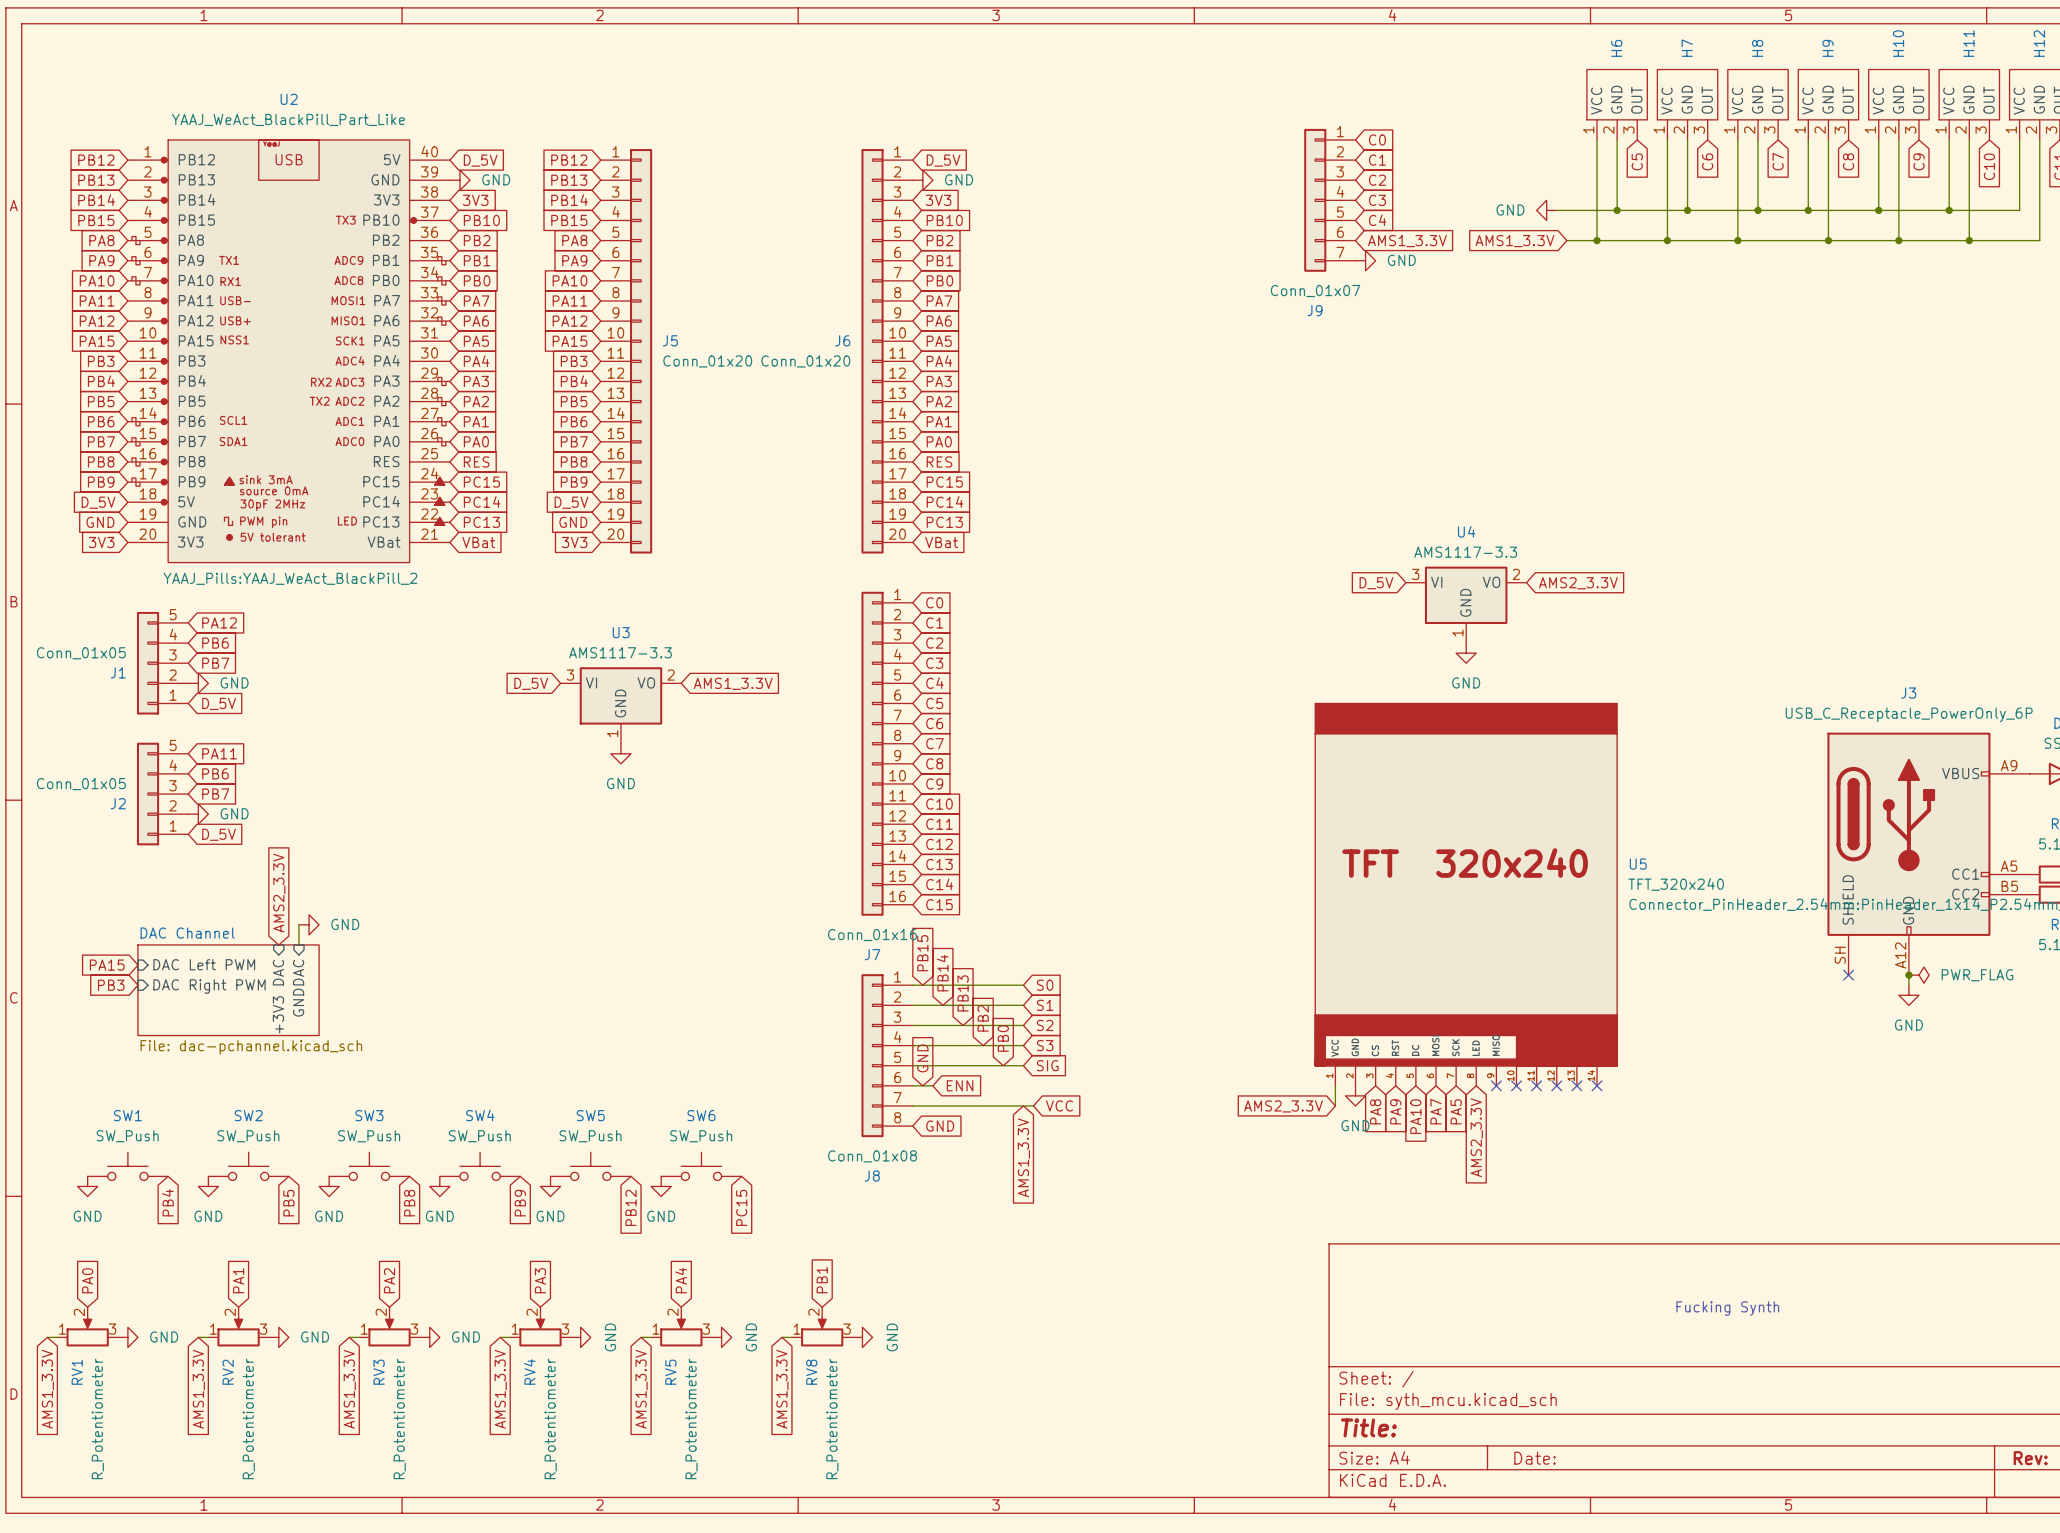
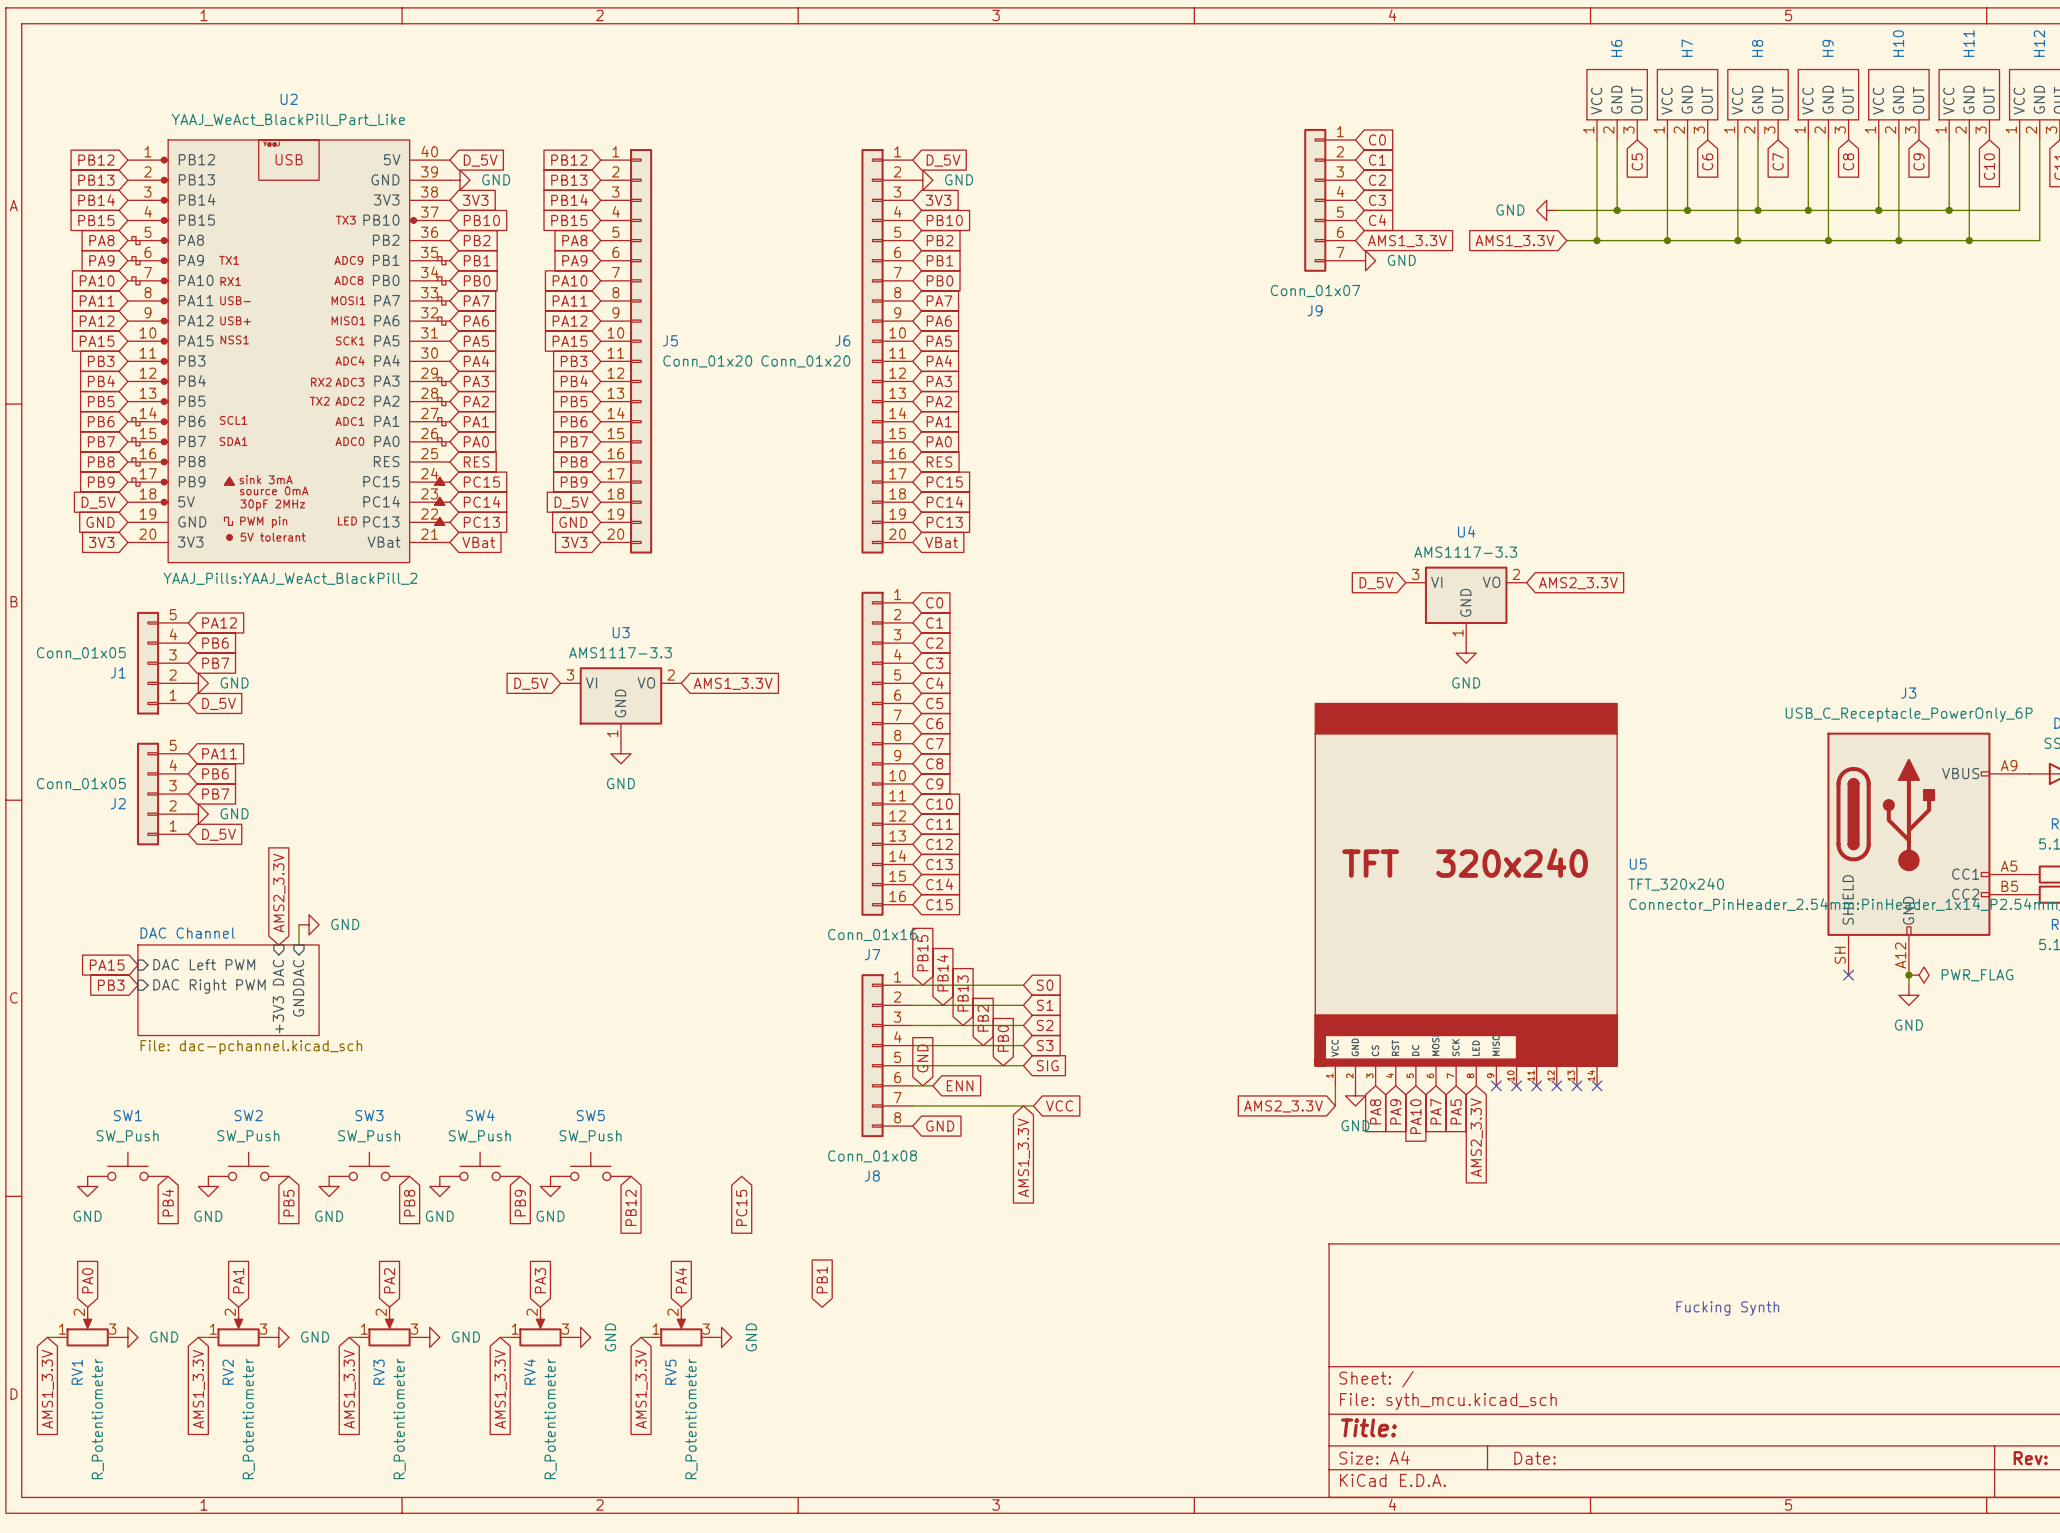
SW6: SW_Push (701, 1166) -> none
power symbol: GND (661, 1186) -> none
RV8: R_Potentiometer (822, 1326) -> none
wire: (781, 1337) (792, 1337) -> none
power symbol: GND (862, 1337) -> none
global label: AMS1_3.3V (782, 1389) -> none

